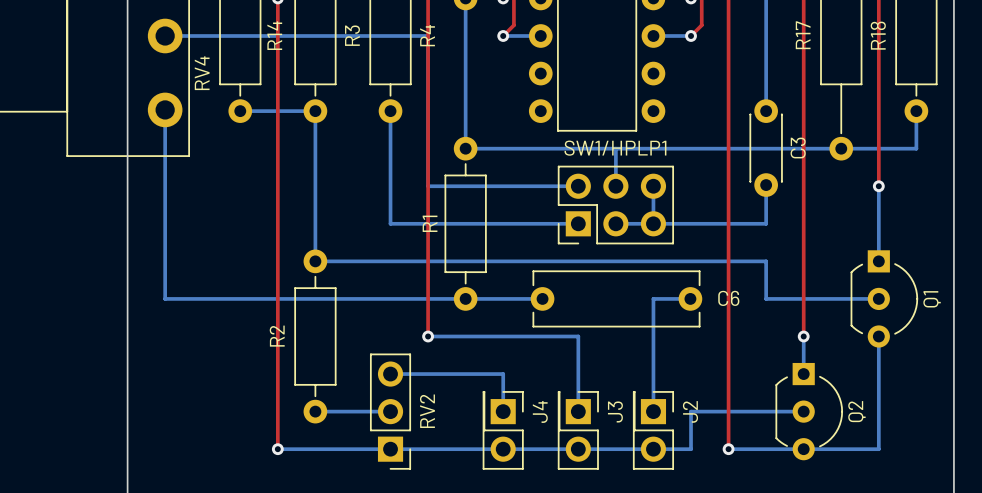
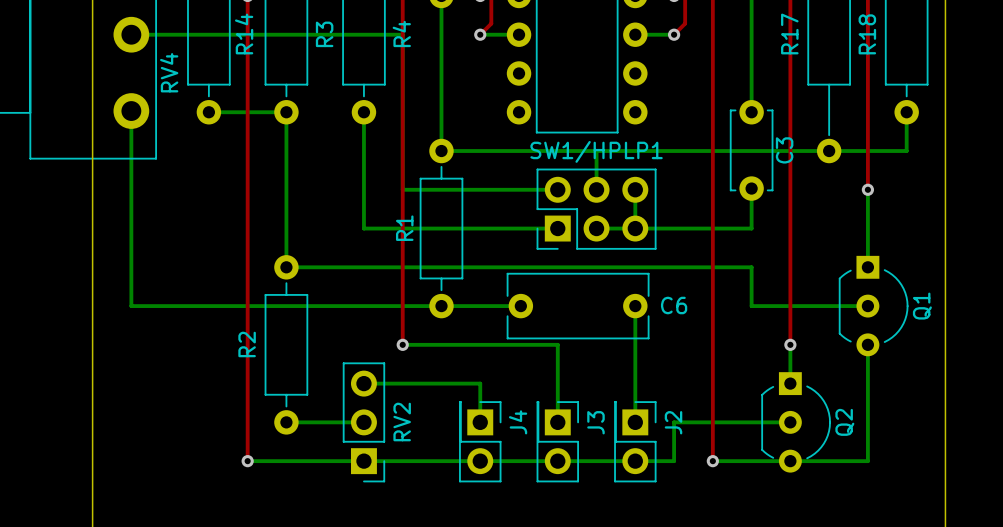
C3 footprint: [749, 99, 783, 197] -> [729, 100, 774, 201]
C6 footprint: [530, 270, 703, 328] -> [506, 272, 650, 340]
bottom track: (653, 298) (690, 298) -> none

